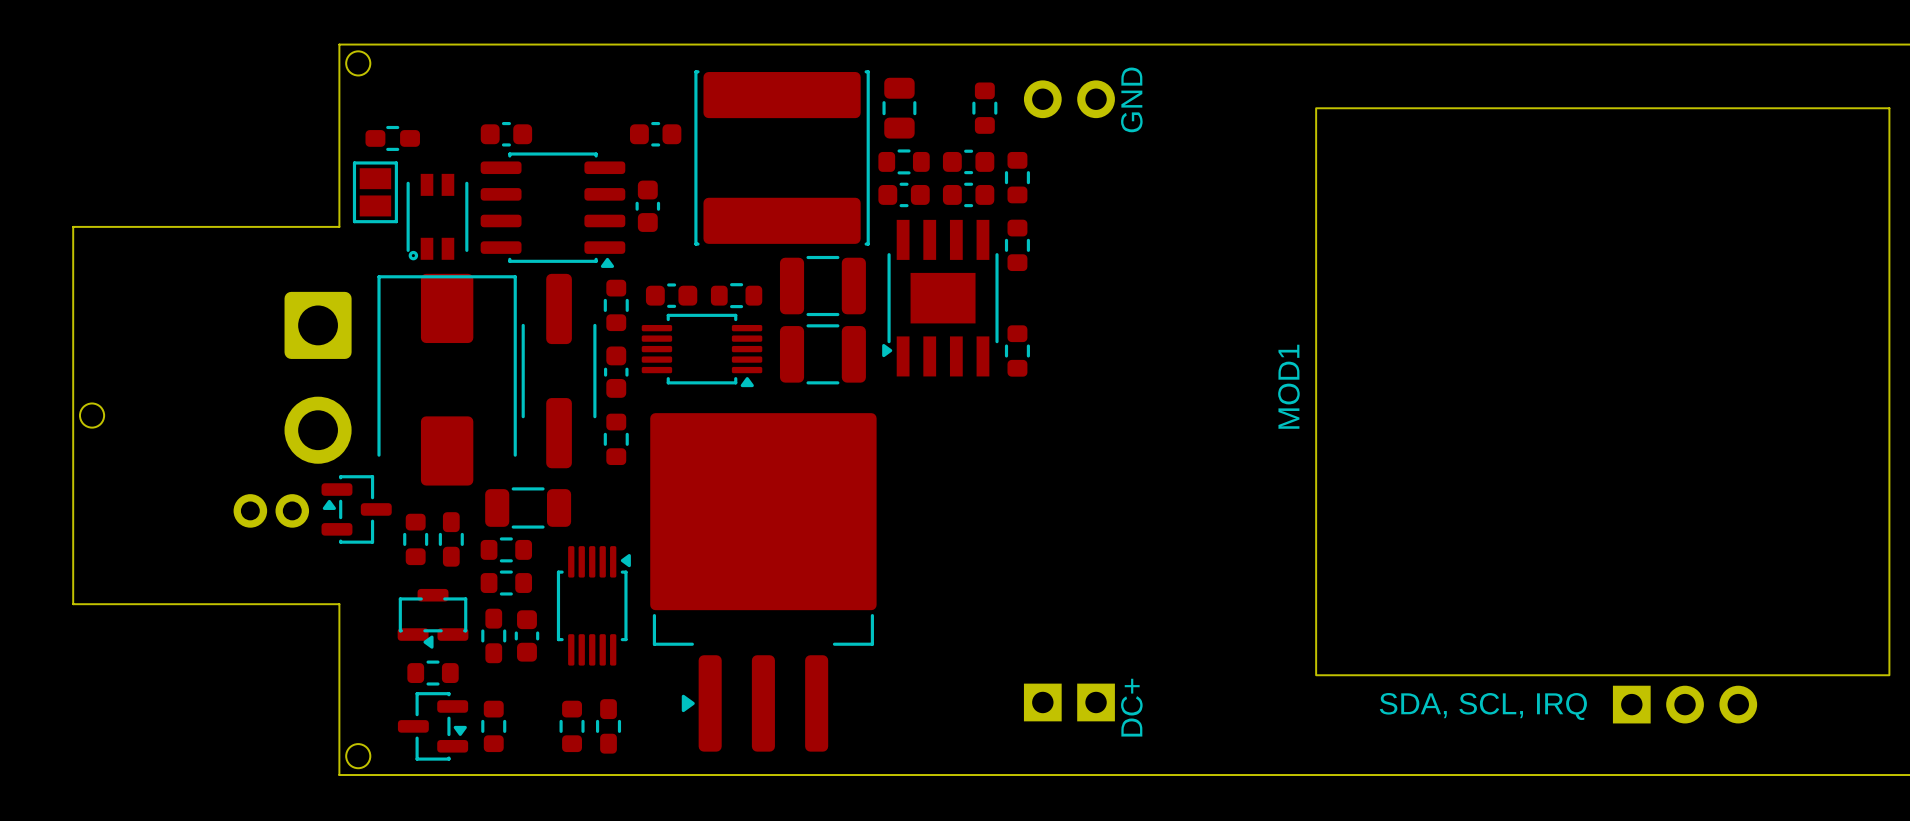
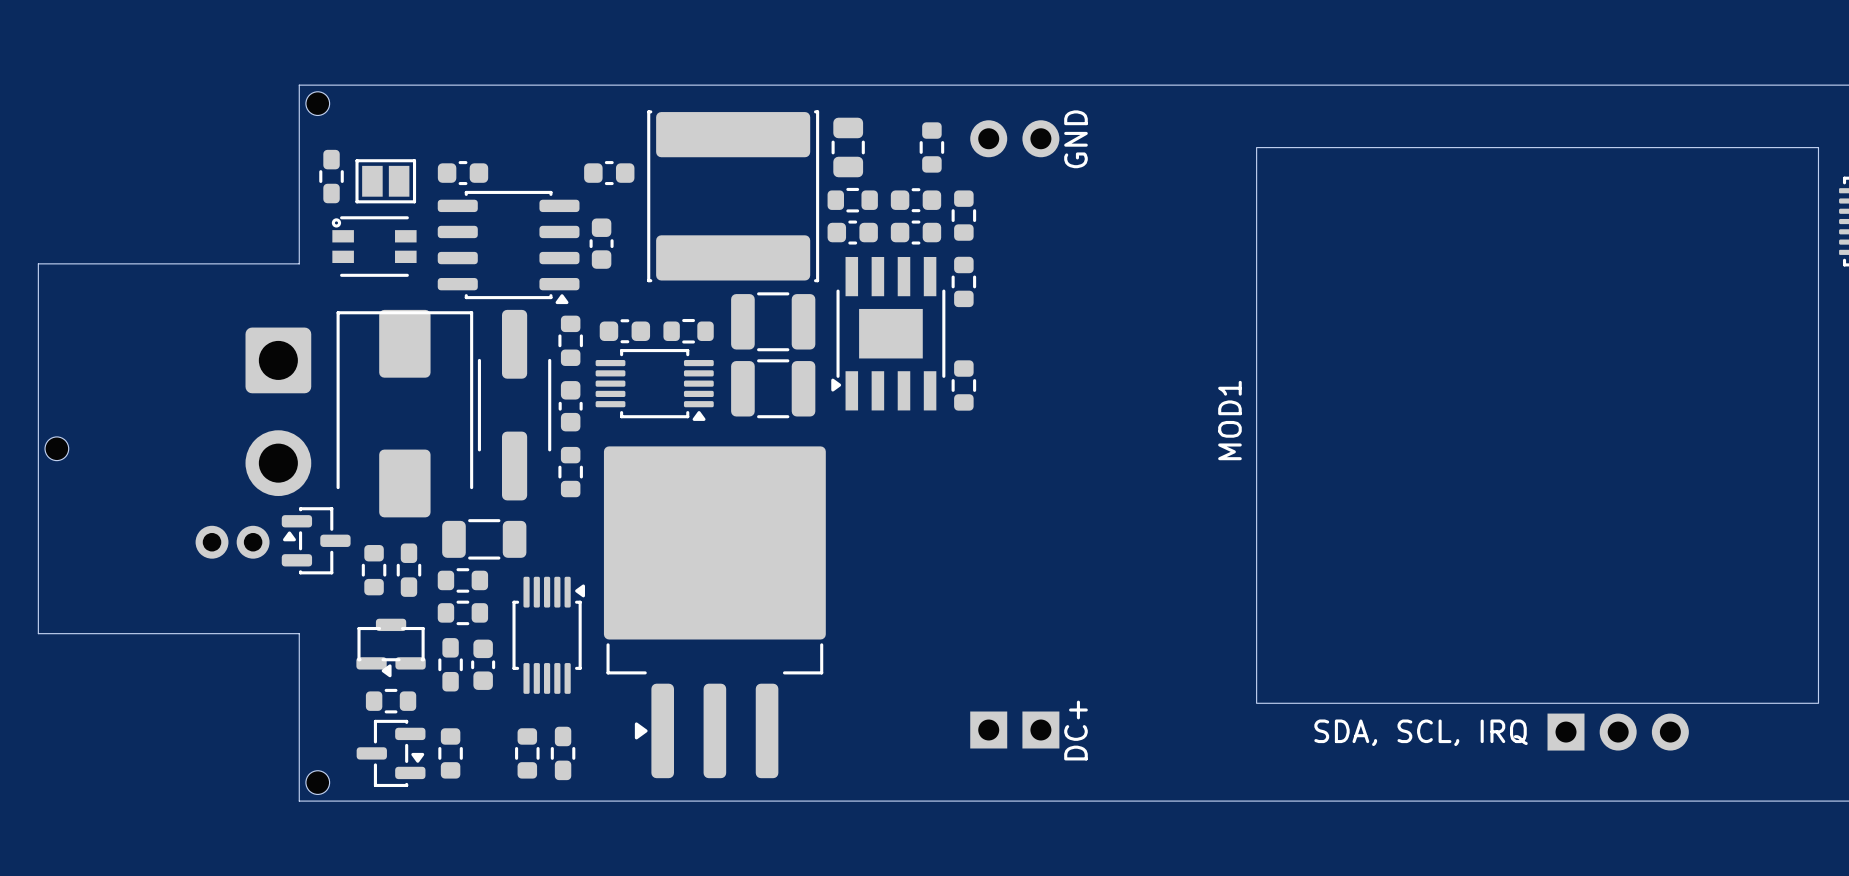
part rotation: 0° (392, 138) -> 90° clockwise (331, 176)
part rotation: 0° (375, 192) -> 90° clockwise (385, 181)
part position: (375, 192) -> (385, 181)
part rotation: 0° (437, 217) -> 90° clockwise (374, 246)

